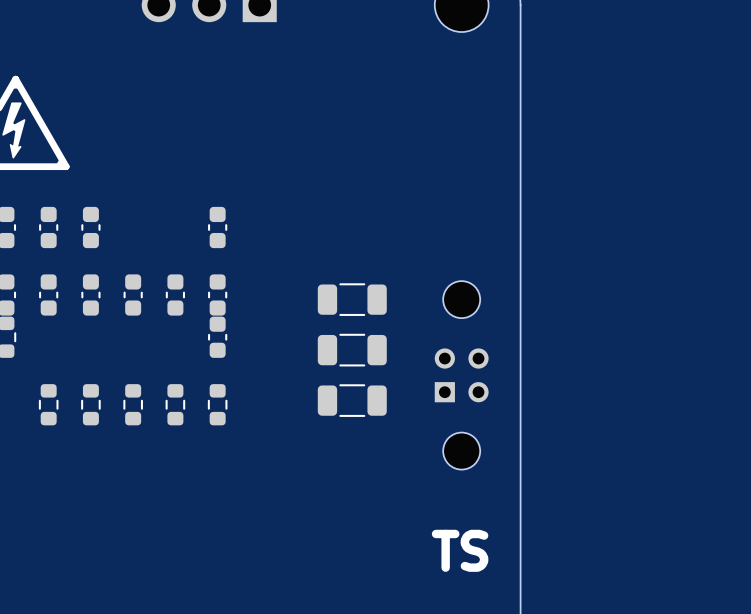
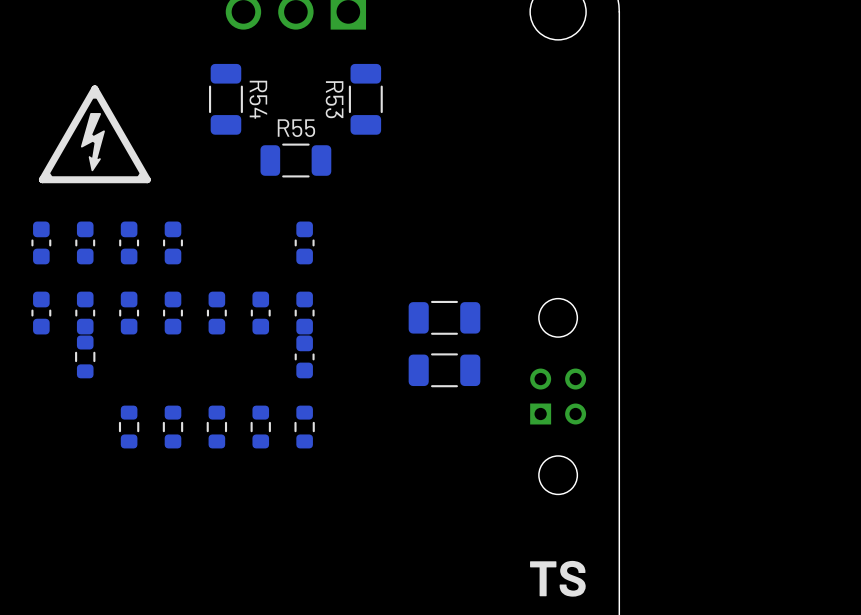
R54: none -> (225, 99)
R53: none -> (365, 99)
R55: none -> (295, 160)
part: (352, 400) -> none

